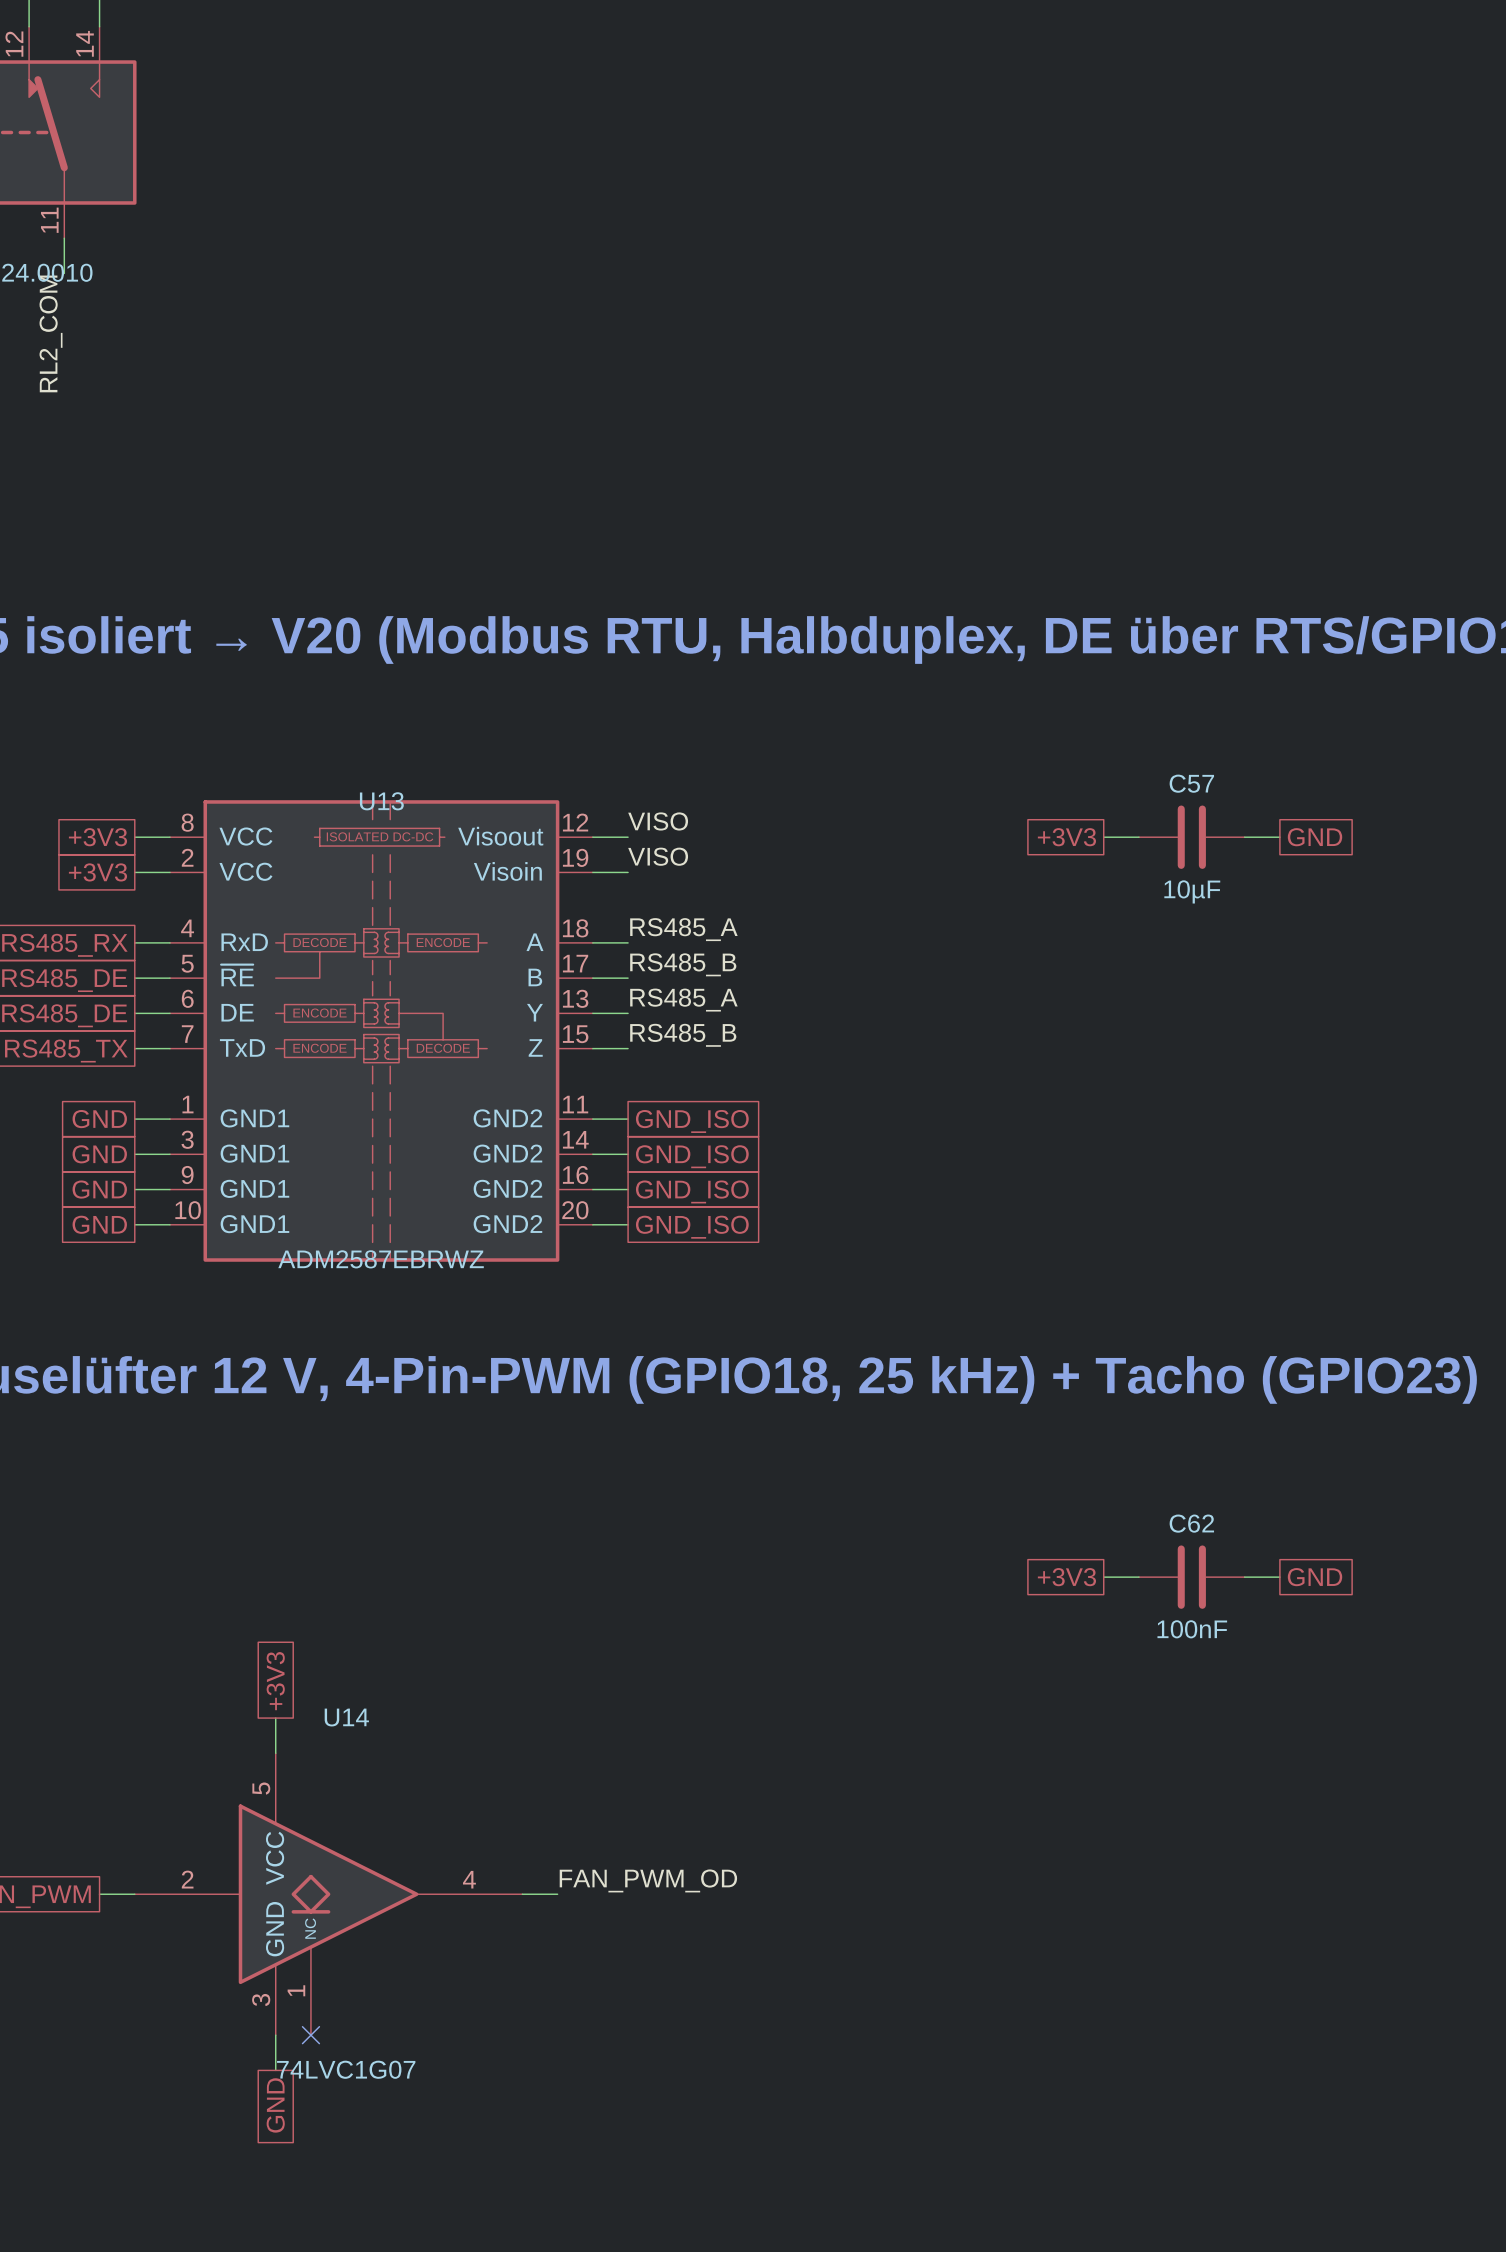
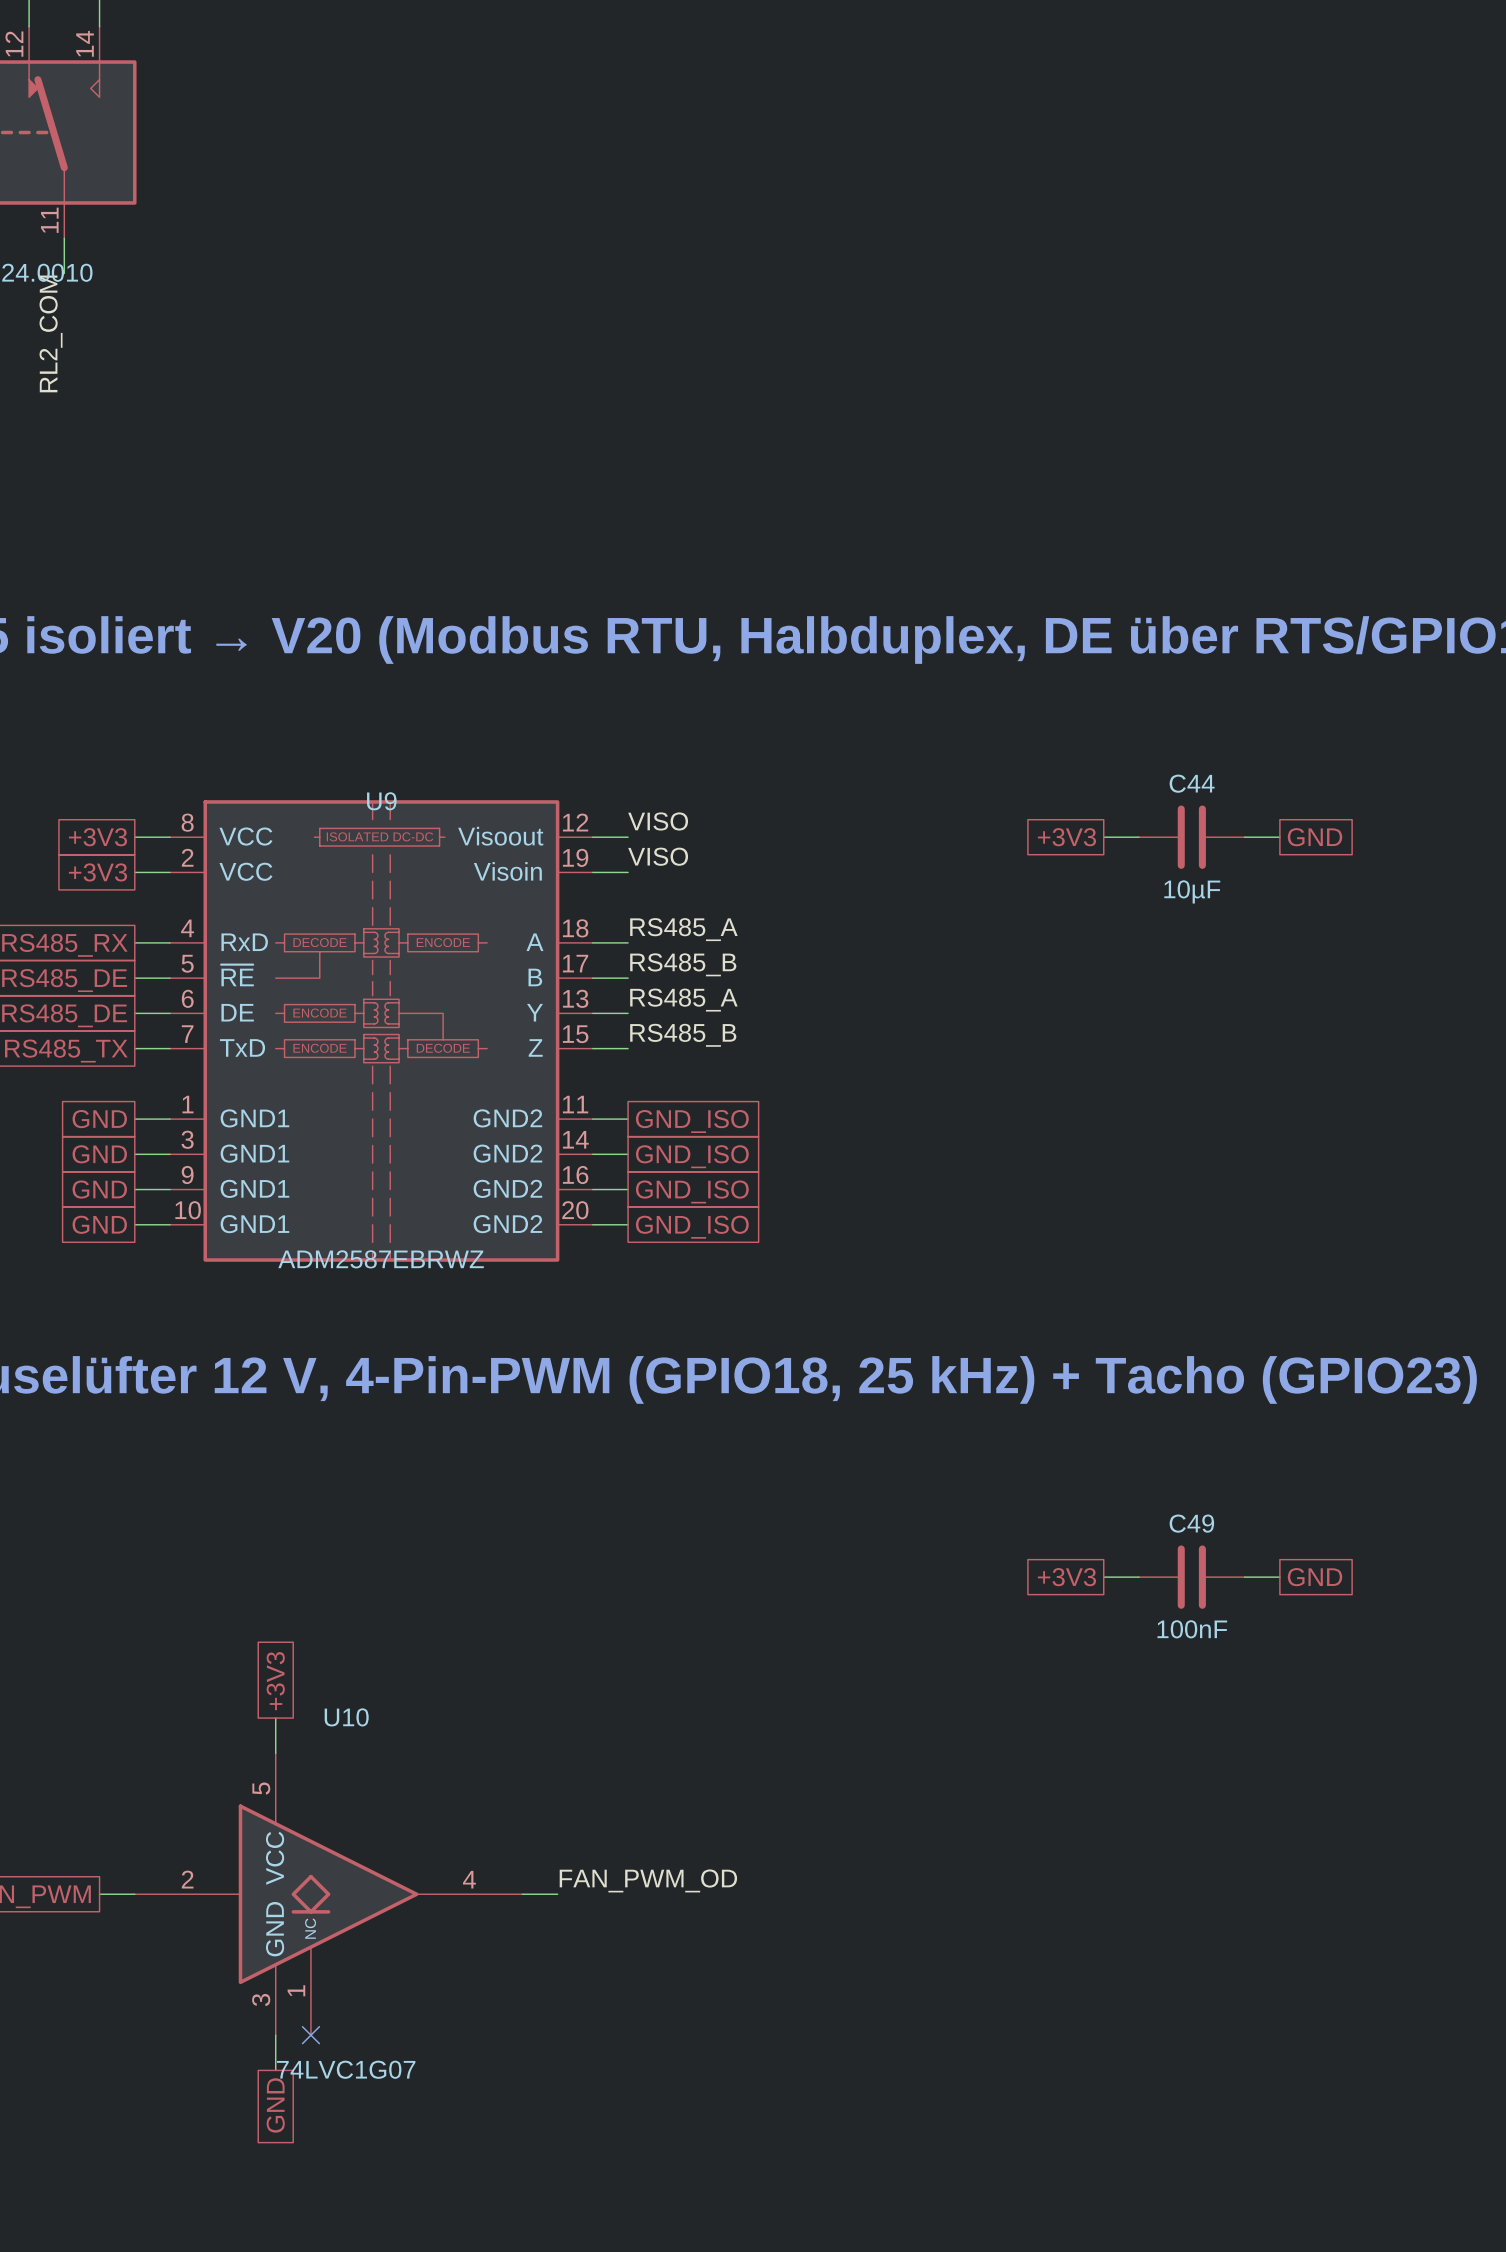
C57 name: C57 (1191, 783) -> C44 (1192, 783)
U13 name: U13 (381, 801) -> U9 (381, 801)
C62 name: C62 (1191, 1523) -> C49 (1191, 1523)
U14 name: U14 (346, 1717) -> U10 (346, 1717)

